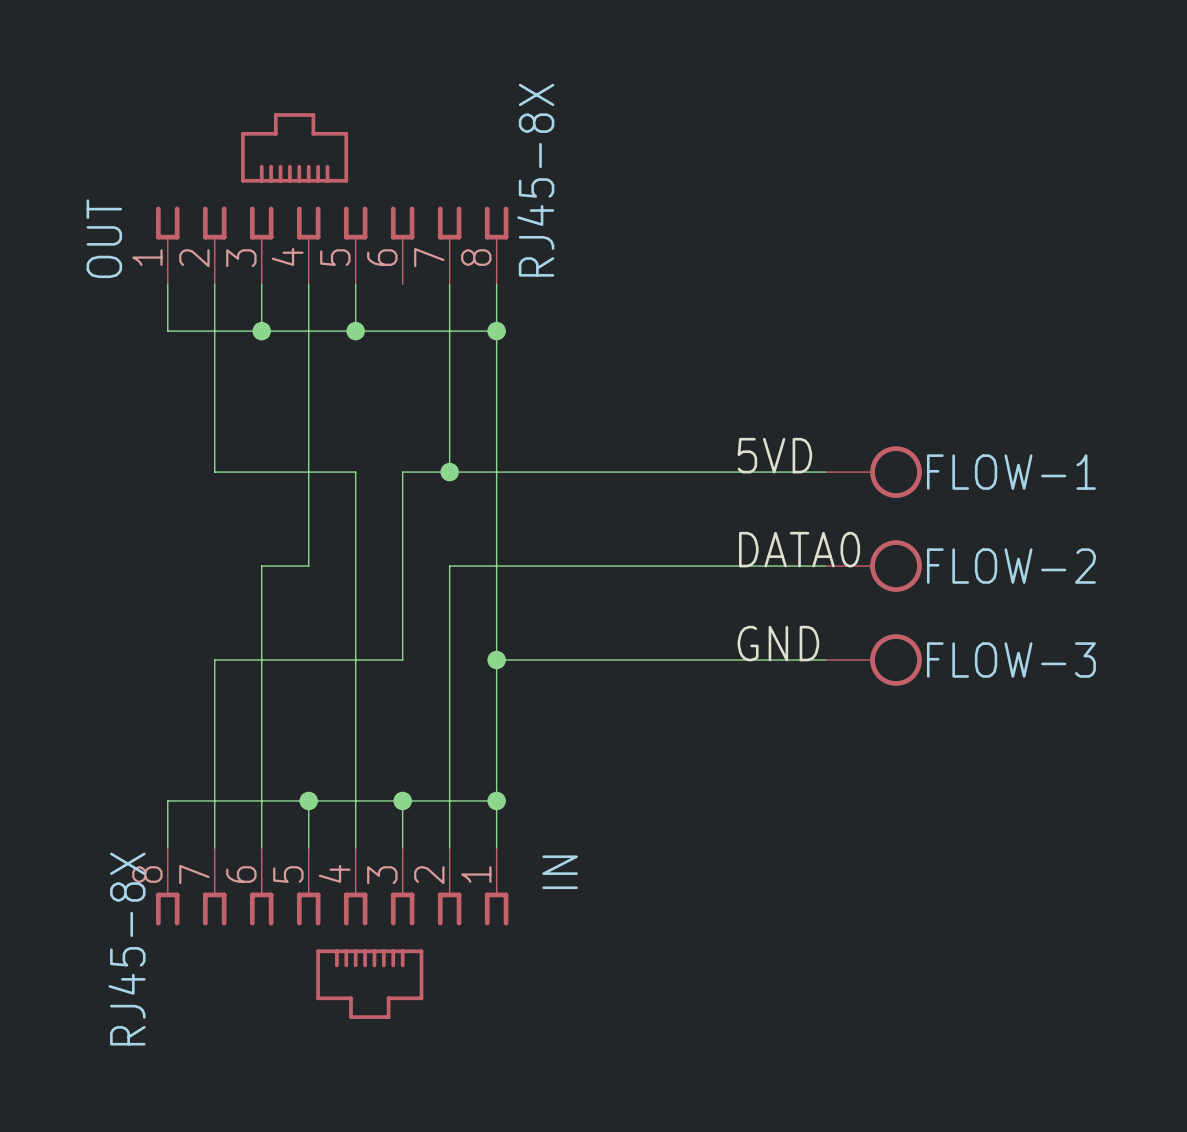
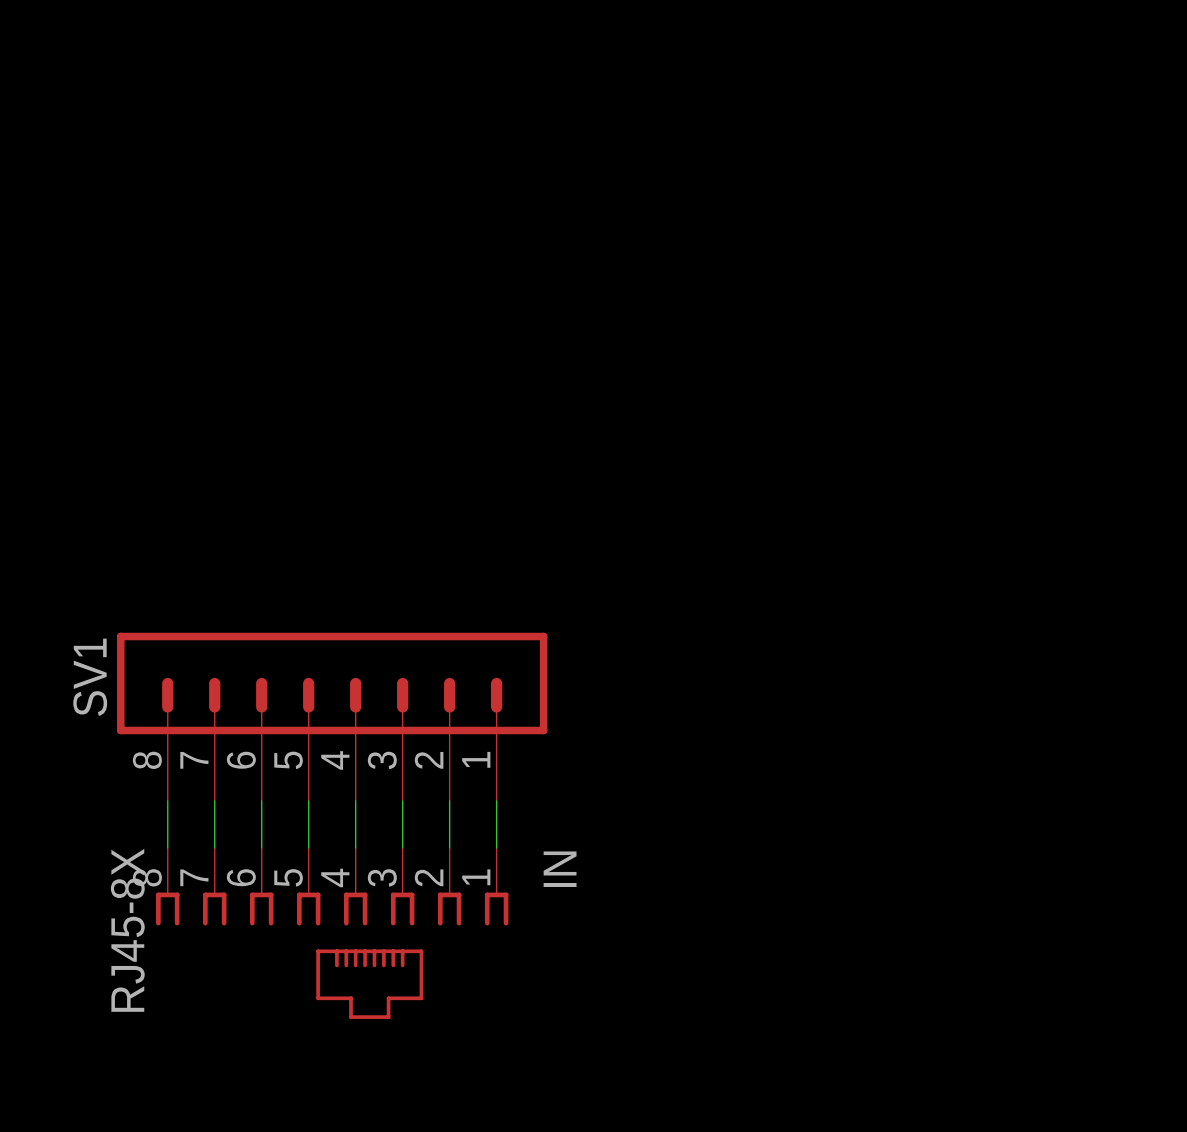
OUT: RJ45-8X (332, 198) -> none
wire: (167, 284) (167, 331) (496, 331) -> none
wire: (214, 284) (214, 472) (355, 472) (355, 800) -> none
wire: (261, 284) (261, 331) -> none
wire: (308, 284) (308, 566) (261, 566) (261, 800) -> none
wire: (355, 284) (355, 331) -> none
wire: (449, 284) (449, 472) -> none
wire: (496, 284) (496, 800) (167, 800) -> none
junction: (261, 331) -> none
junction: (355, 331) -> none
junction: (496, 331) -> none
label: 5VD (774, 455) -> none
junction: (449, 472) -> none
wire: (825, 472) (402, 472) (402, 660) (214, 660) (214, 800) -> none
FLOW-1: (873, 472) -> none
label: DATA0 (799, 549) -> none
wire: (825, 566) (449, 566) (449, 800) -> none
FLOW-2: (873, 566) -> none
label: GND (778, 643) -> none
wire: (496, 660) (825, 660) -> none
junction: (496, 660) -> none
FLOW-3: (873, 660) -> none
SV1: none -> (332, 716)
junction: (308, 800) -> none
junction: (402, 800) -> none
junction: (496, 800) -> none

